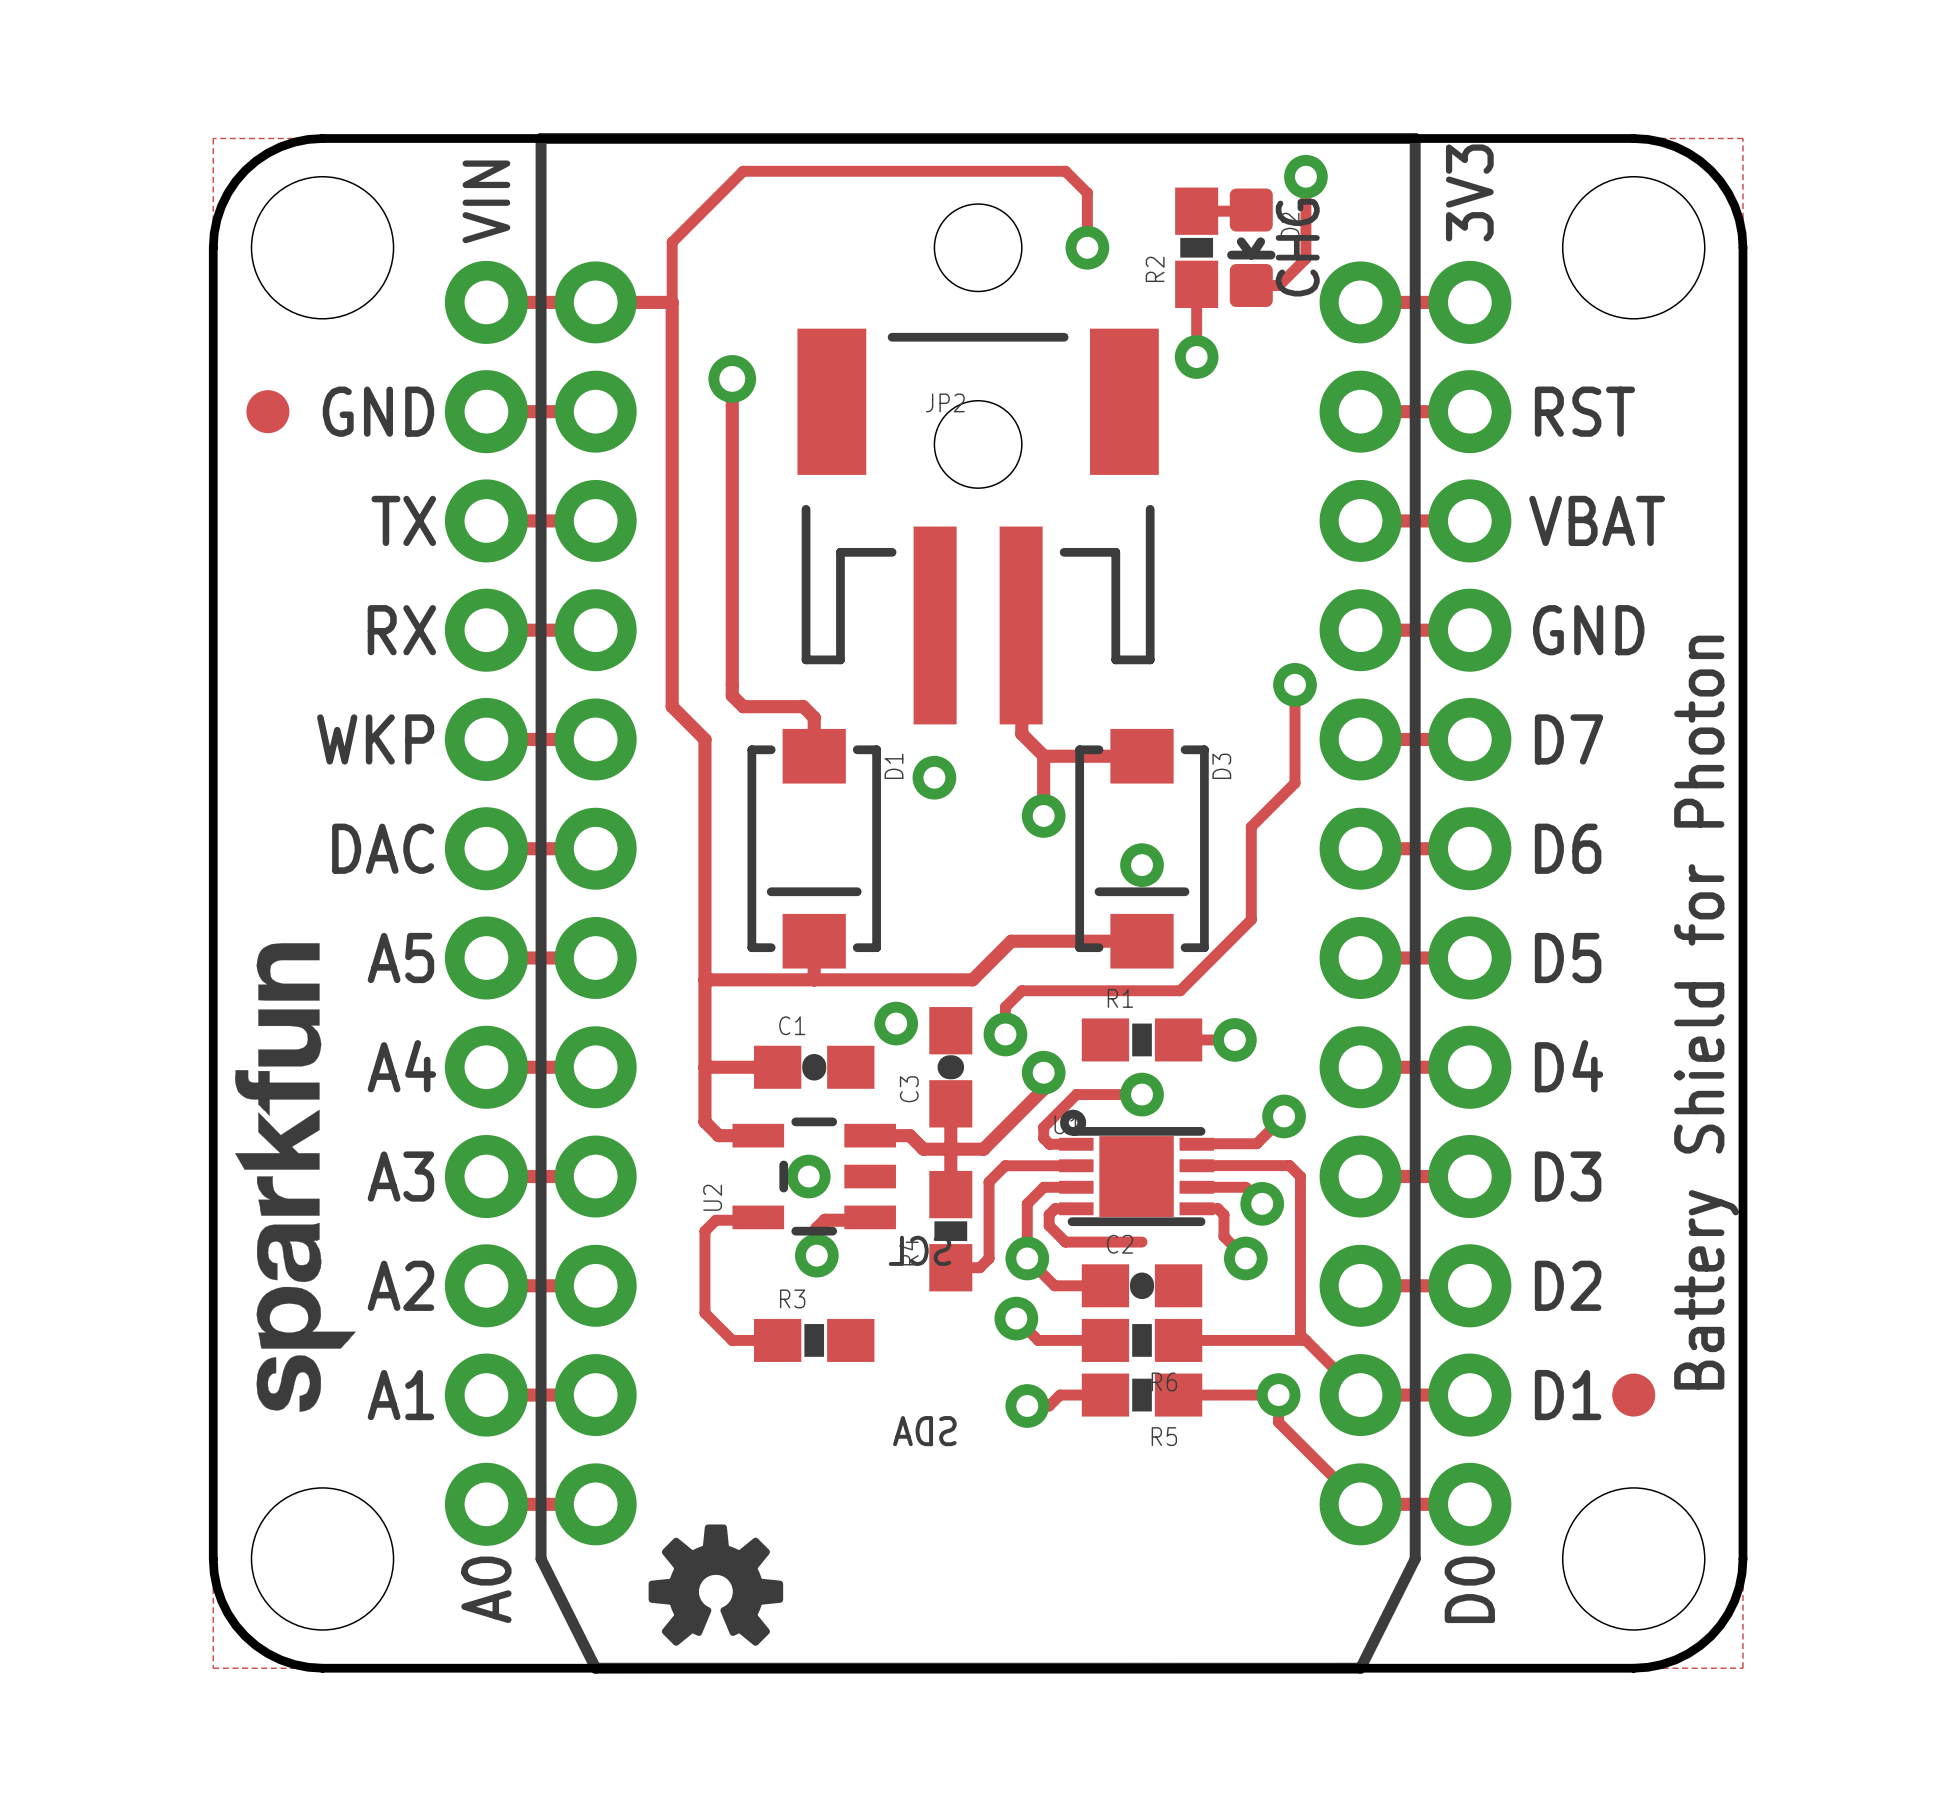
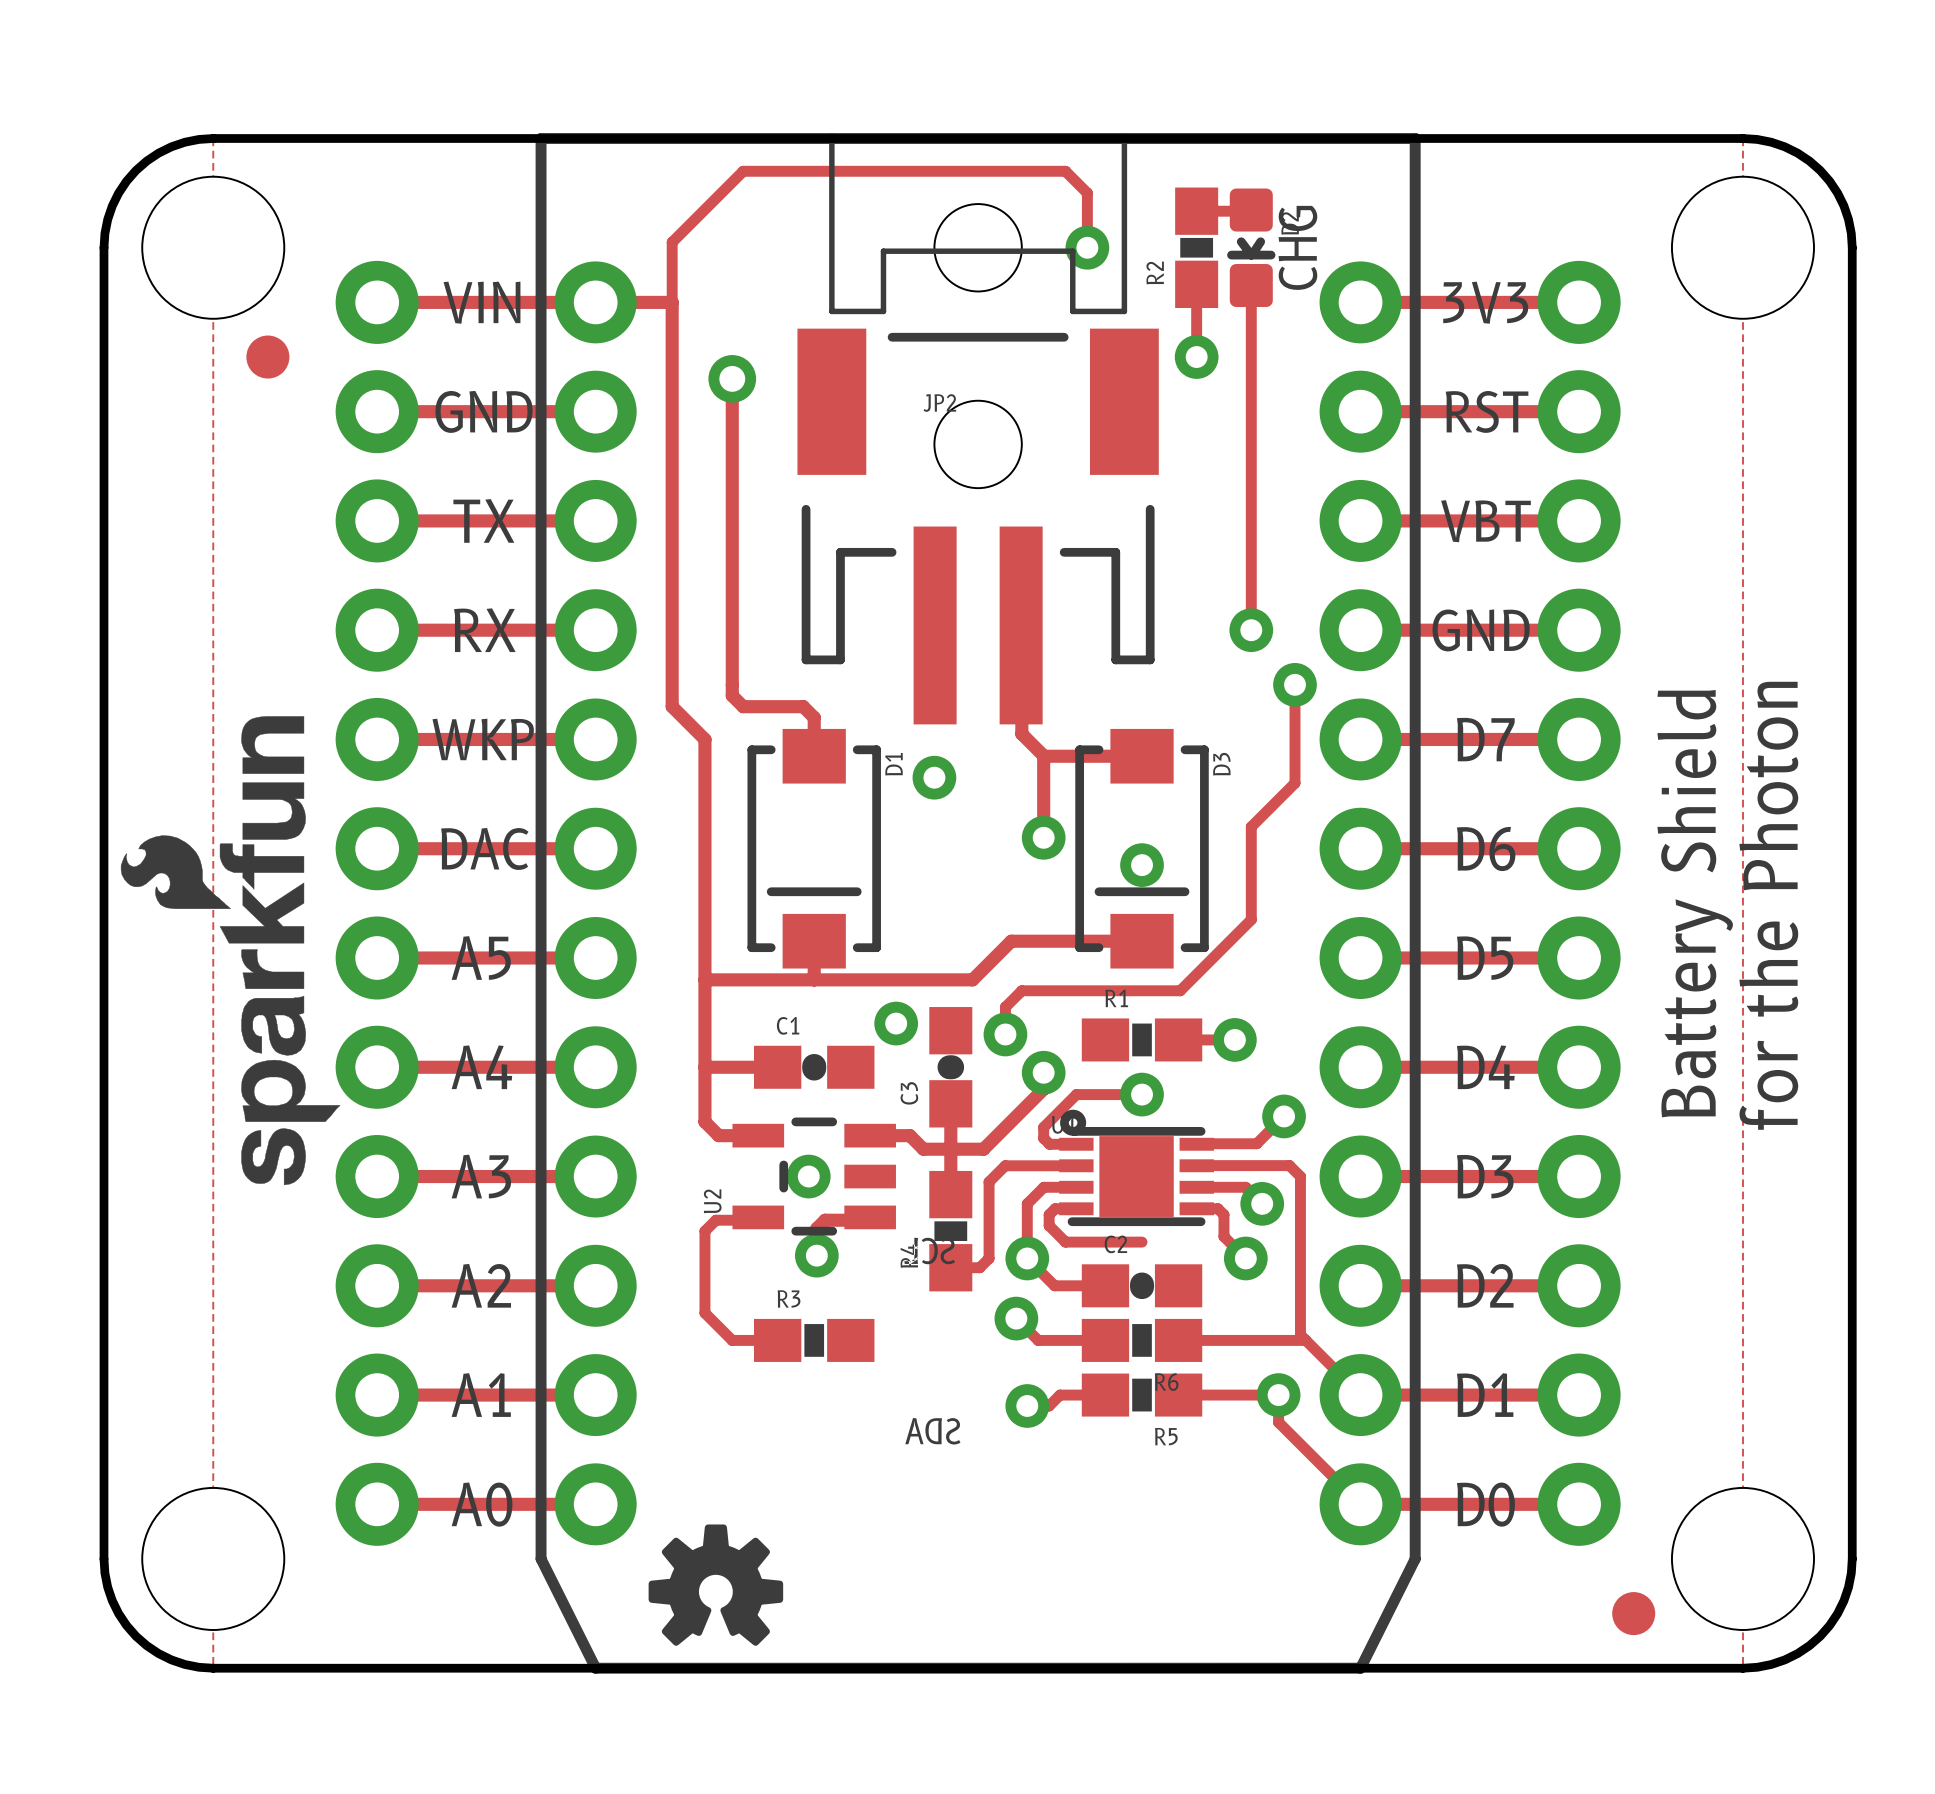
part footprint: [251, 133, 1705, 1674] -> [142, 133, 1815, 1674]
board edge: (322, 138) (294, 142) (280, 146) (256, 161) (245, 170) (235, 181) (221, 205) (216, 219) (213, 247) (214, 1573) (221, 1600) (235, 1625) (245, 1636) (256, 1645) (280, 1659) (294, 1664) (322, 1668) -> (322, 138) (199, 139) (184, 142) (158, 153) (135, 170) (118, 193) (107, 219) (103, 247) (104, 1573) (112, 1600) (126, 1625) (146, 1645) (171, 1659) (184, 1664) (213, 1668) (322, 1668)
board edge: (1633, 138) (1662, 142) (1675, 146) (1700, 161) (1710, 170) (1720, 181) (1734, 205) (1739, 219) (1742, 247) (1742, 1573) (1734, 1600) (1720, 1625) (1710, 1636) (1700, 1645) (1675, 1659) (1662, 1664) (1633, 1668) -> (1633, 138) (1757, 139) (1771, 142) (1797, 153) (1820, 170) (1837, 193) (1848, 219) (1852, 247) (1851, 1573) (1843, 1600) (1829, 1625) (1809, 1645) (1784, 1659) (1771, 1664) (1742, 1668) (1633, 1668)
track: (1305, 176) (1305, 258) (1279, 285) (1251, 285) -> (1251, 630) (1251, 285)
via: (1305, 176) -> none
part position: (267, 411) -> (267, 357)
via: none -> (1251, 630)
drawing: none -> [120, 716, 341, 1186]
via position: (1043, 815) -> (1043, 837)
text: none -> for the Photon (1768, 905)
drawing: [235, 943, 356, 1412] -> none
text: Battery Shield for Photon (1706, 1012) -> Battery Shield (1695, 903)
part position: (1633, 1395) -> (1633, 1613)

